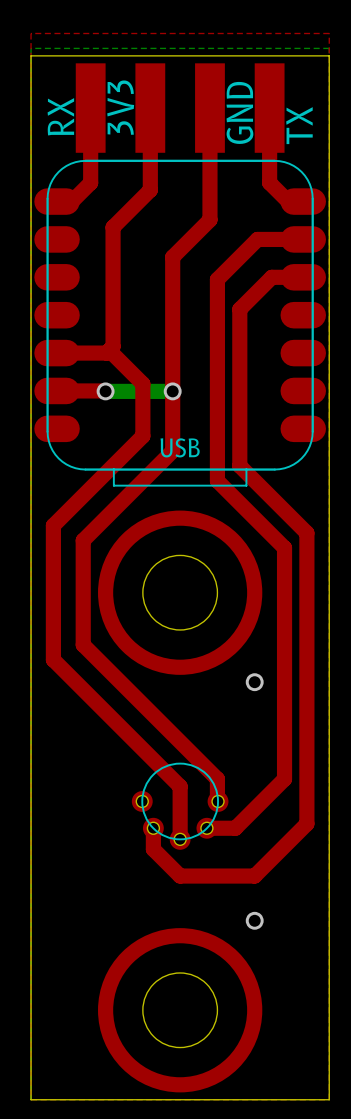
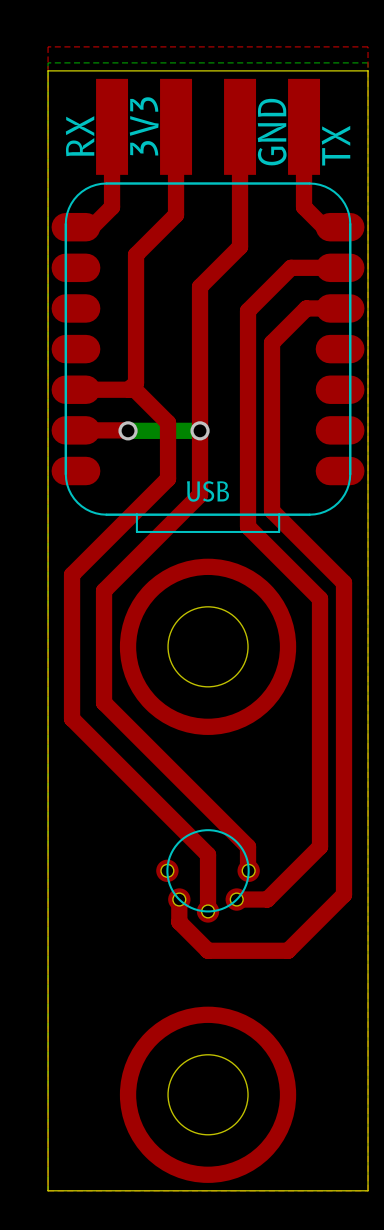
via: (254, 682) -> none
via: (254, 920) -> none

